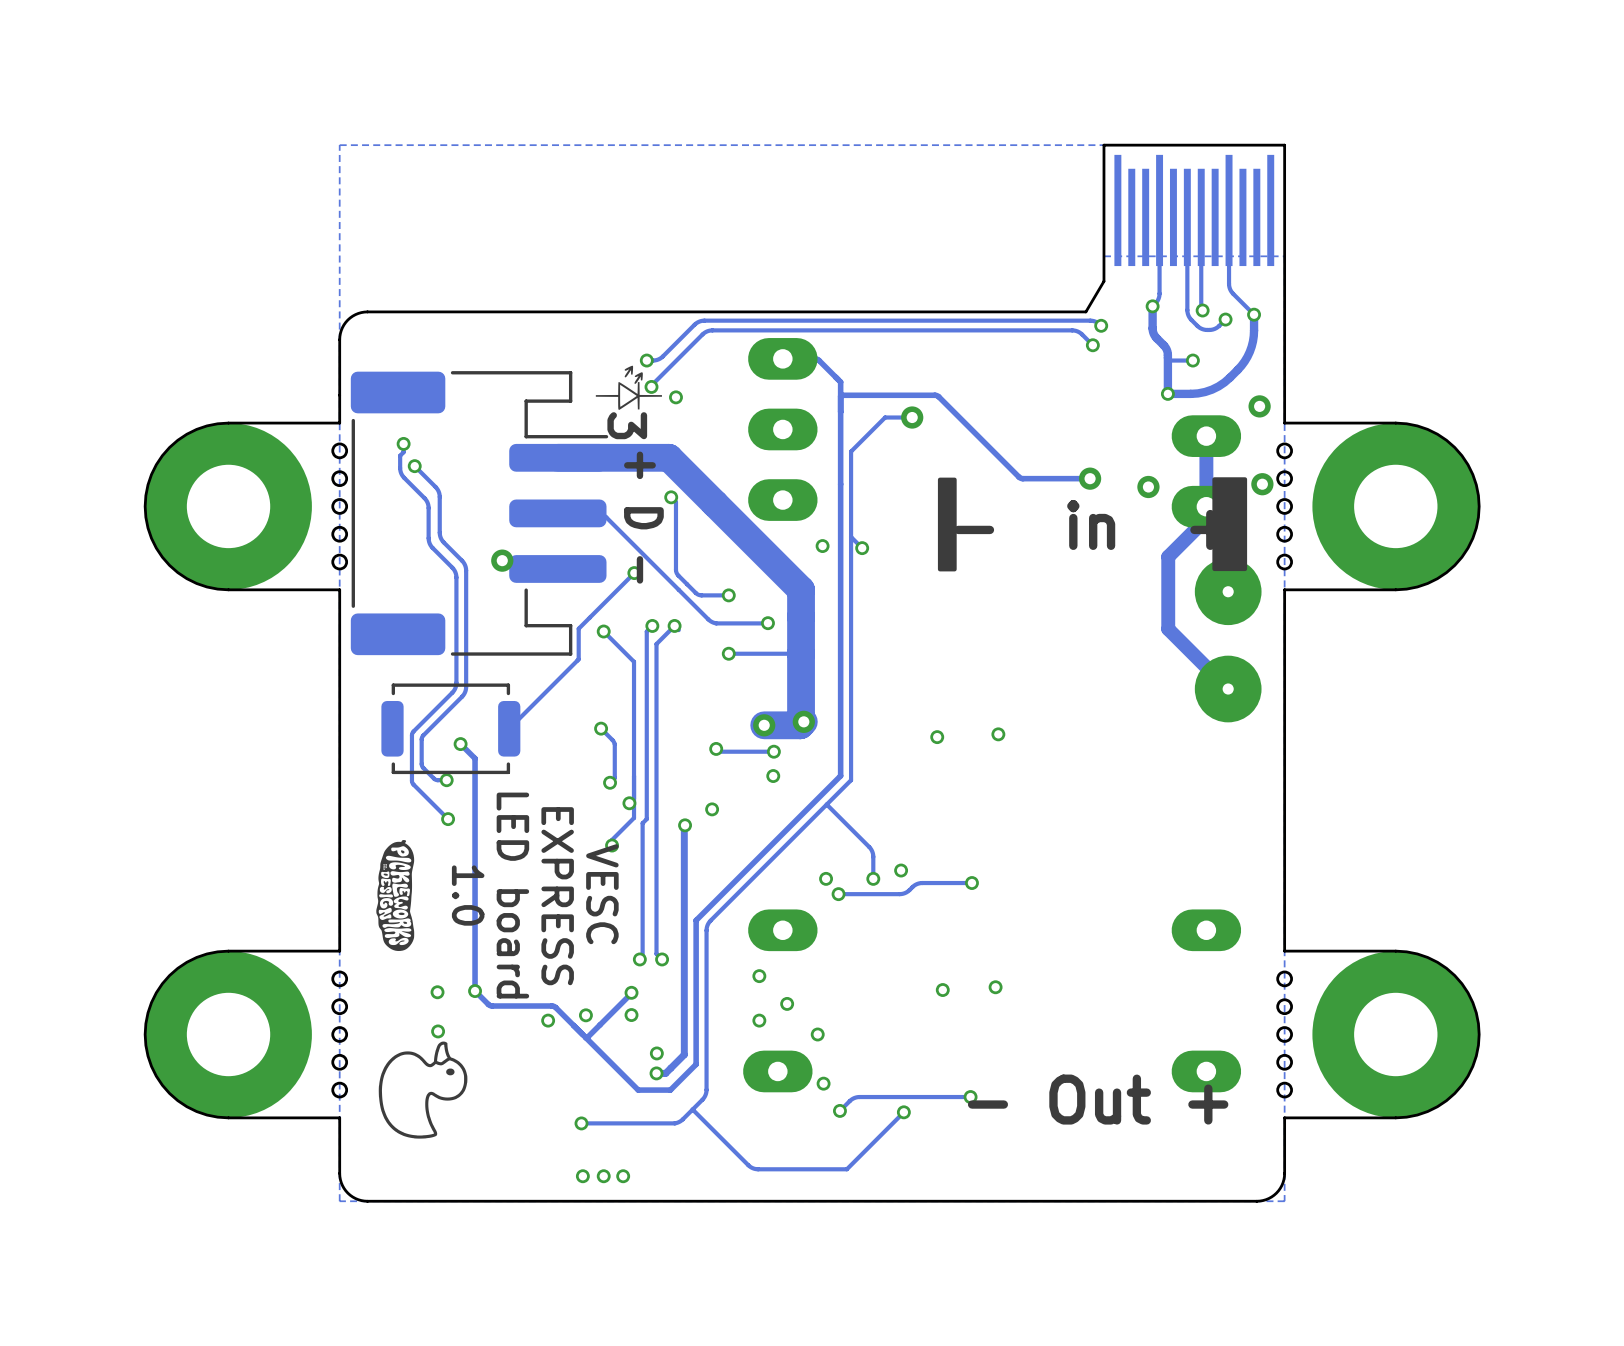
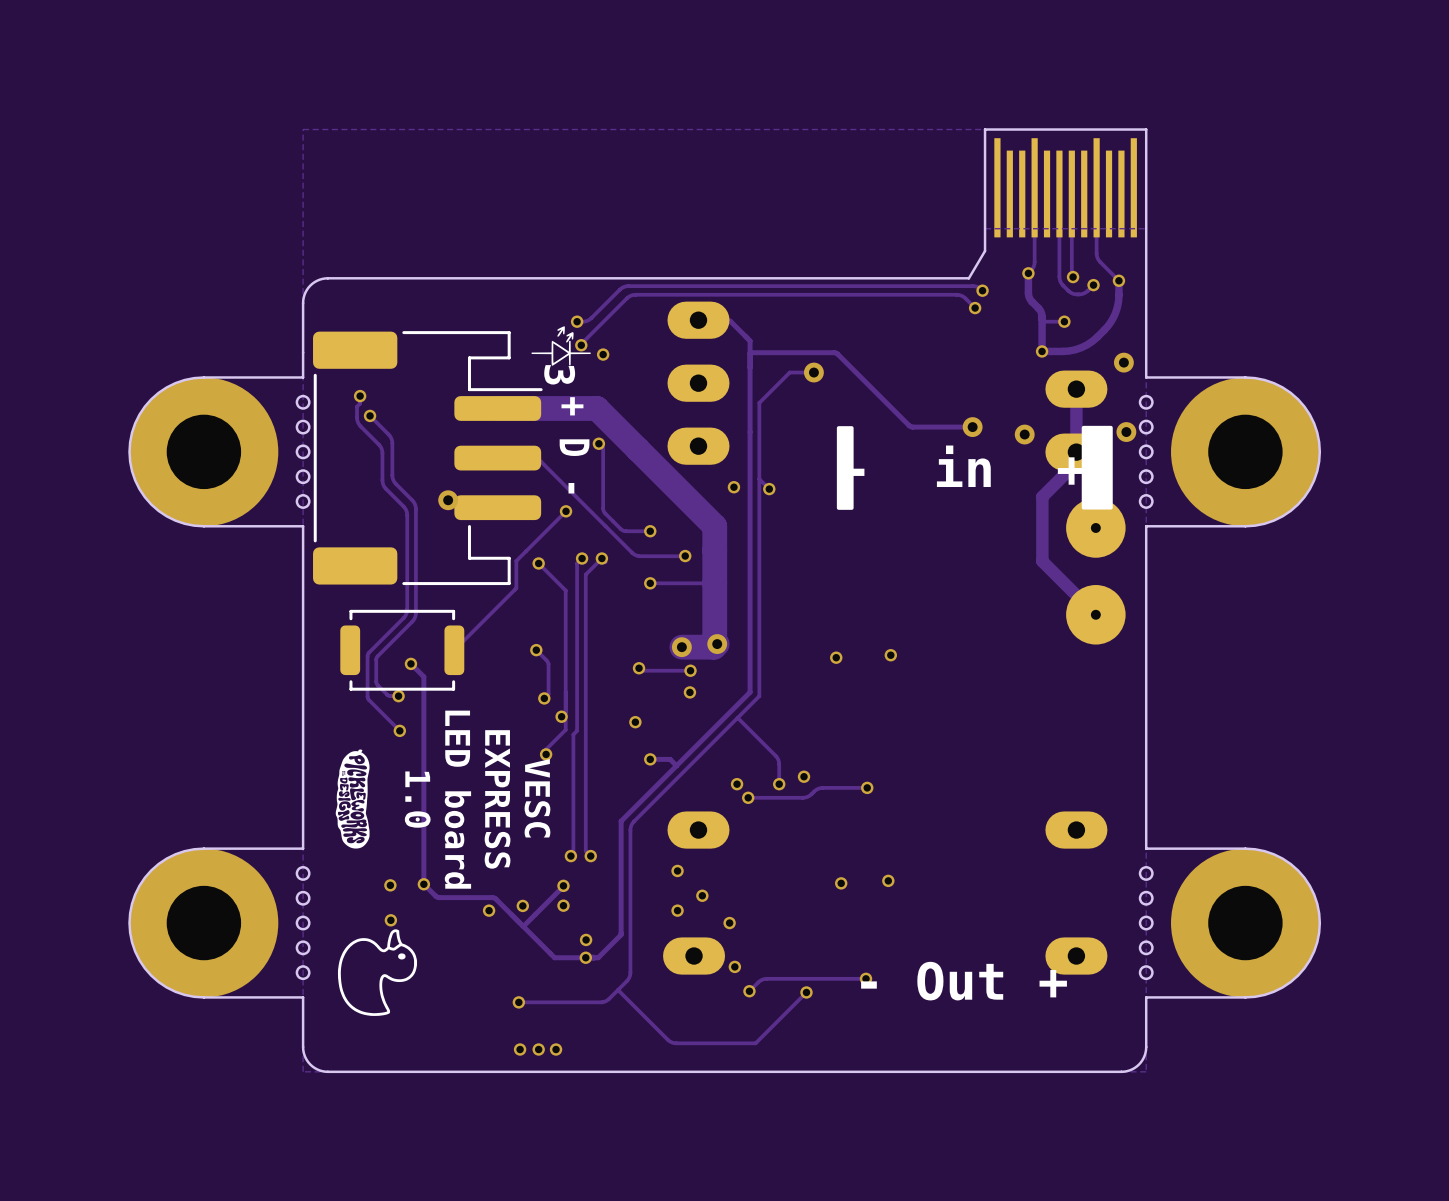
track: (685, 825) (684, 1054) (665, 1073) -> none
via position: (685, 825) -> (650, 759)
track: none -> (650, 759) (670, 759) (676, 765)
track: (696, 1047) (696, 1064) (670, 1090) (638, 1090) (621, 1073) -> (621, 934) (598, 957) (593, 957)
track: none -> (585, 957) (554, 957)

